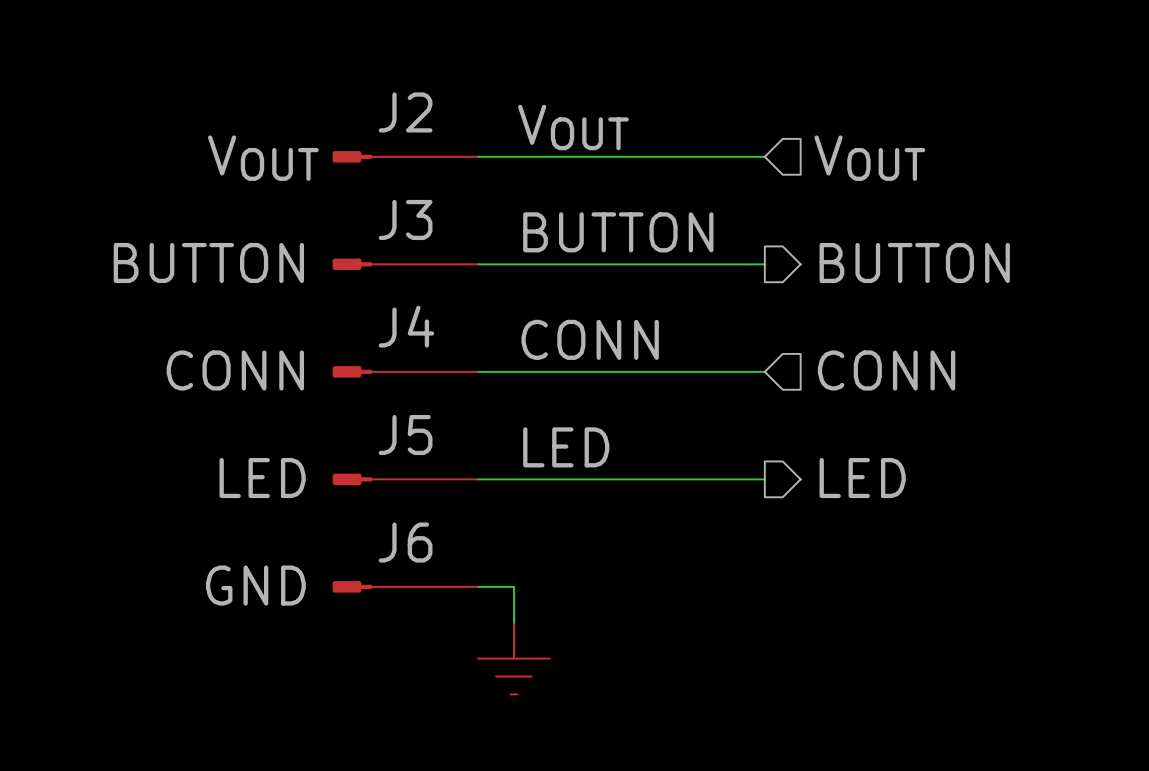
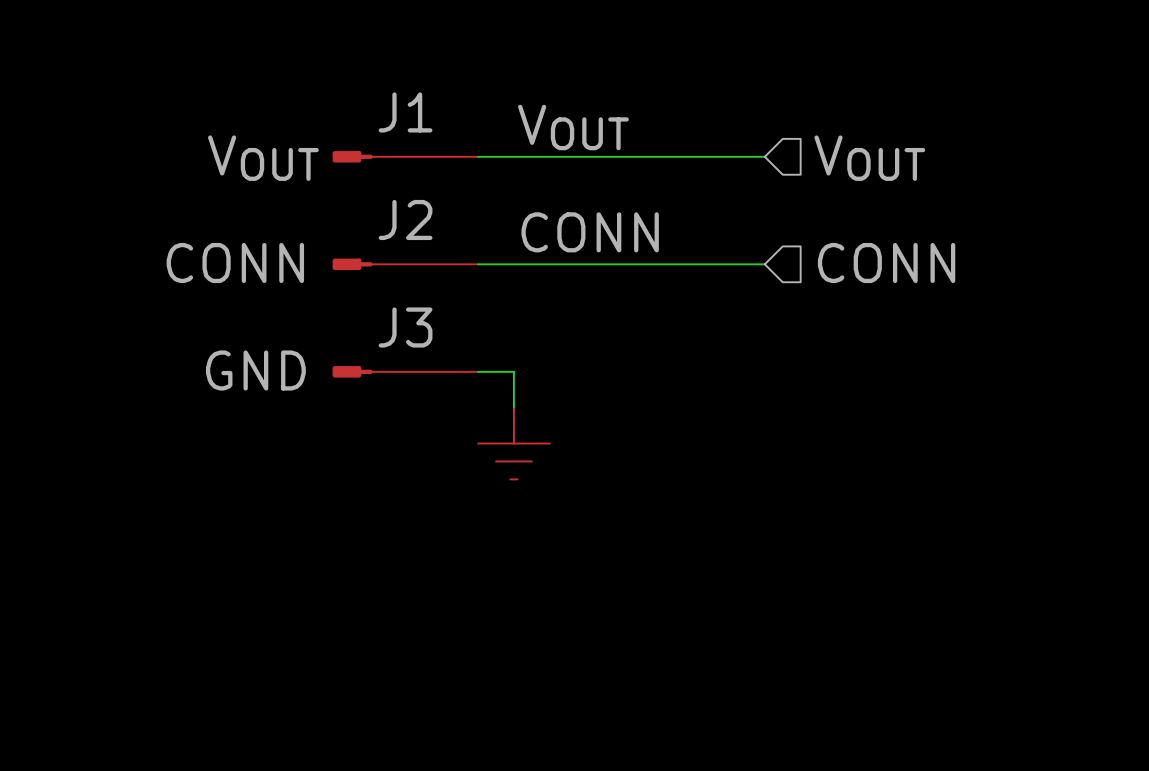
J2 name: J2 (405, 112) -> J1 (405, 112)
J3 name: J3 (405, 219) -> J2 (405, 219)
label: BUTTON (618, 232) -> CONN (590, 232)
J3 value: BUTTON (208, 262) -> CONN (235, 262)
hierarchical label shape: output (914, 262) -> input (886, 262)
hierarchical label: BUTTON (914, 262) -> CONN (886, 262)
J4 name: J4 (406, 326) -> J3 (405, 327)
label: CONN (590, 339) -> none
J4 value: CONN (235, 370) -> GND (255, 370)
hierarchical label: CONN (886, 370) -> none
wire: (513, 371) (764, 371) -> (513, 371) (513, 407)
label: LED (566, 447) -> none
hierarchical label: LED (862, 478) -> none
J5: LED (405, 479) -> none
wire: (478, 479) (764, 479) -> none
J6: GND (405, 586) -> none
wire: (478, 586) (513, 586) (513, 622) -> none
power symbol position: (513, 658) -> (513, 443)

